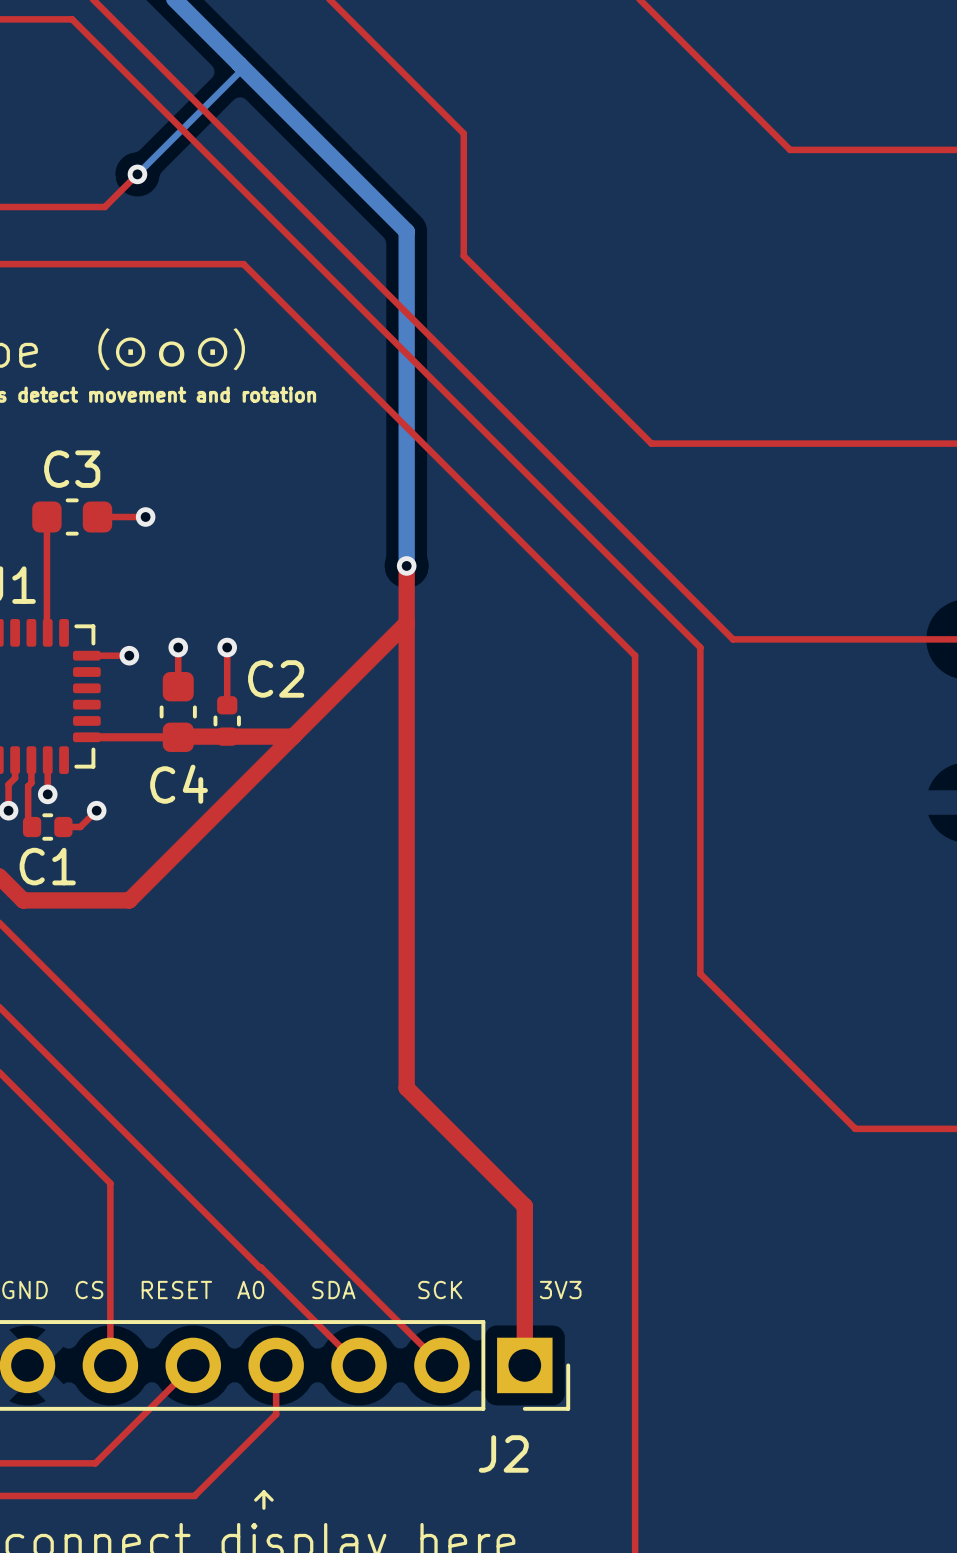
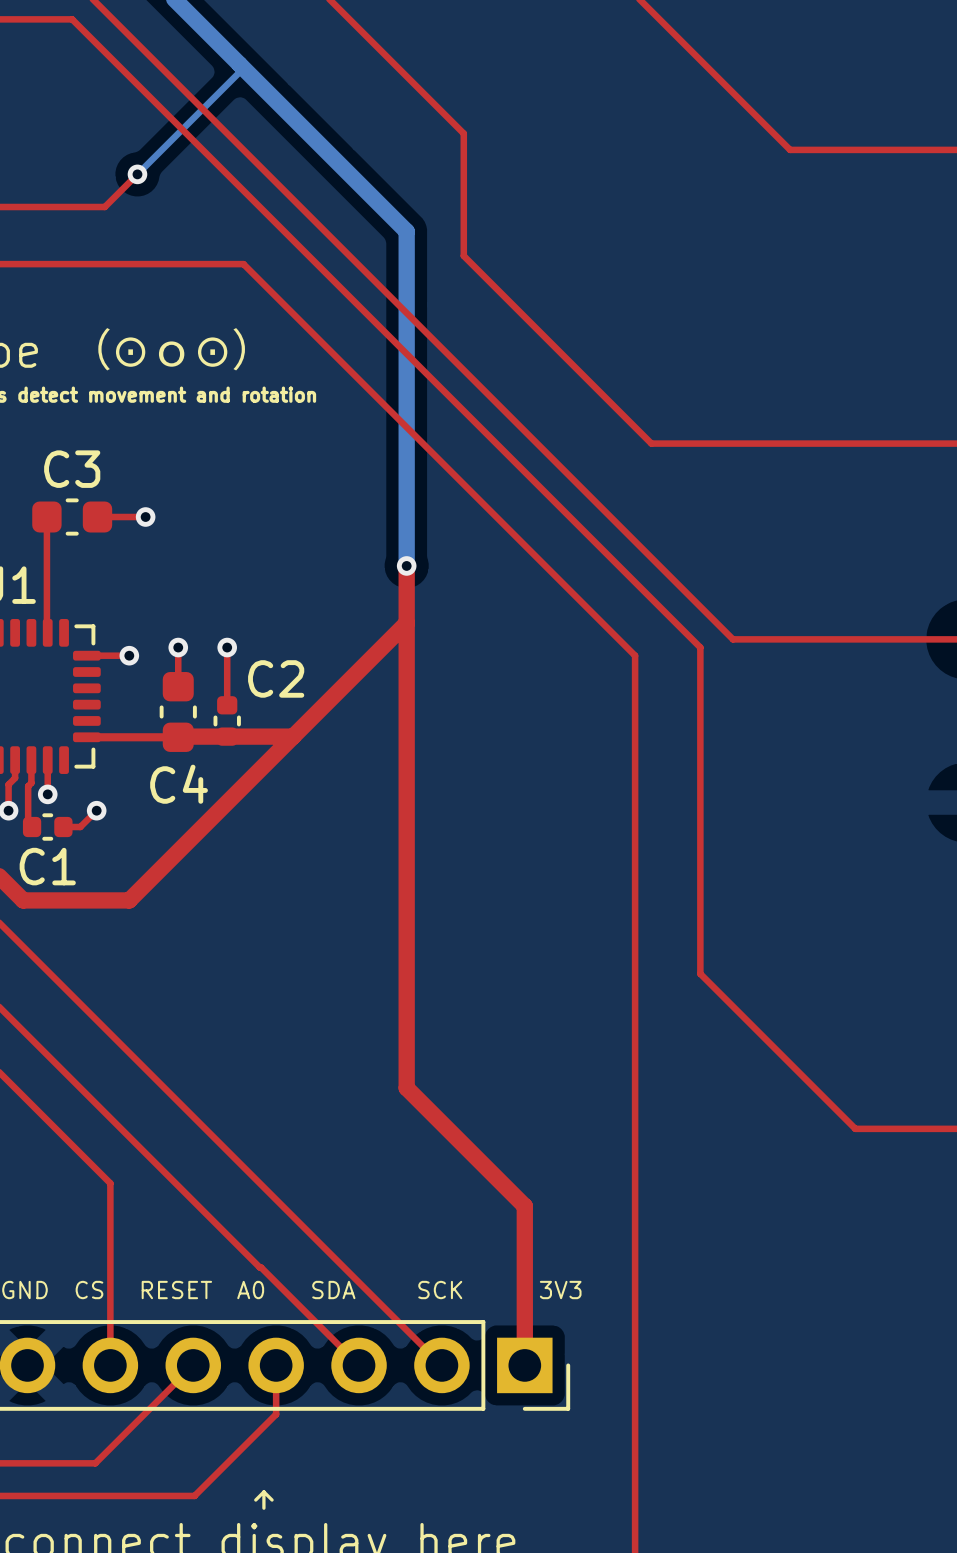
J2 name: J2 (503, 1453) -> none

